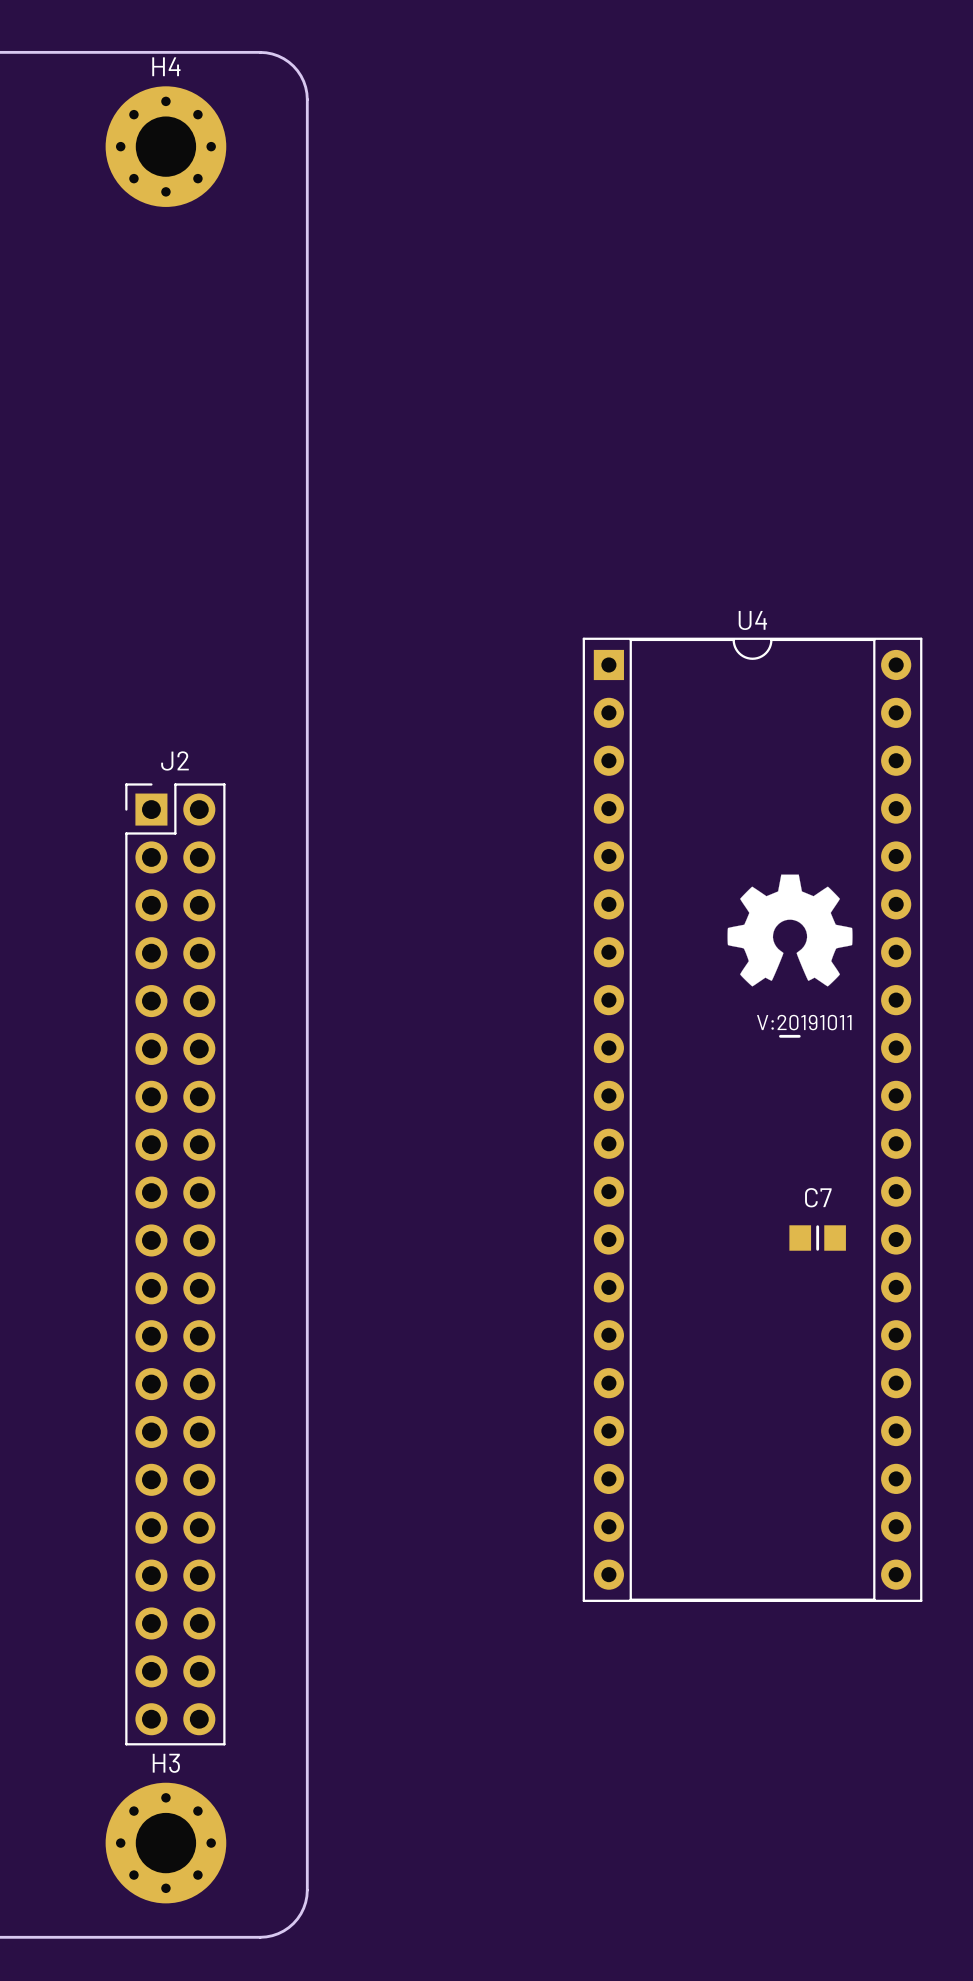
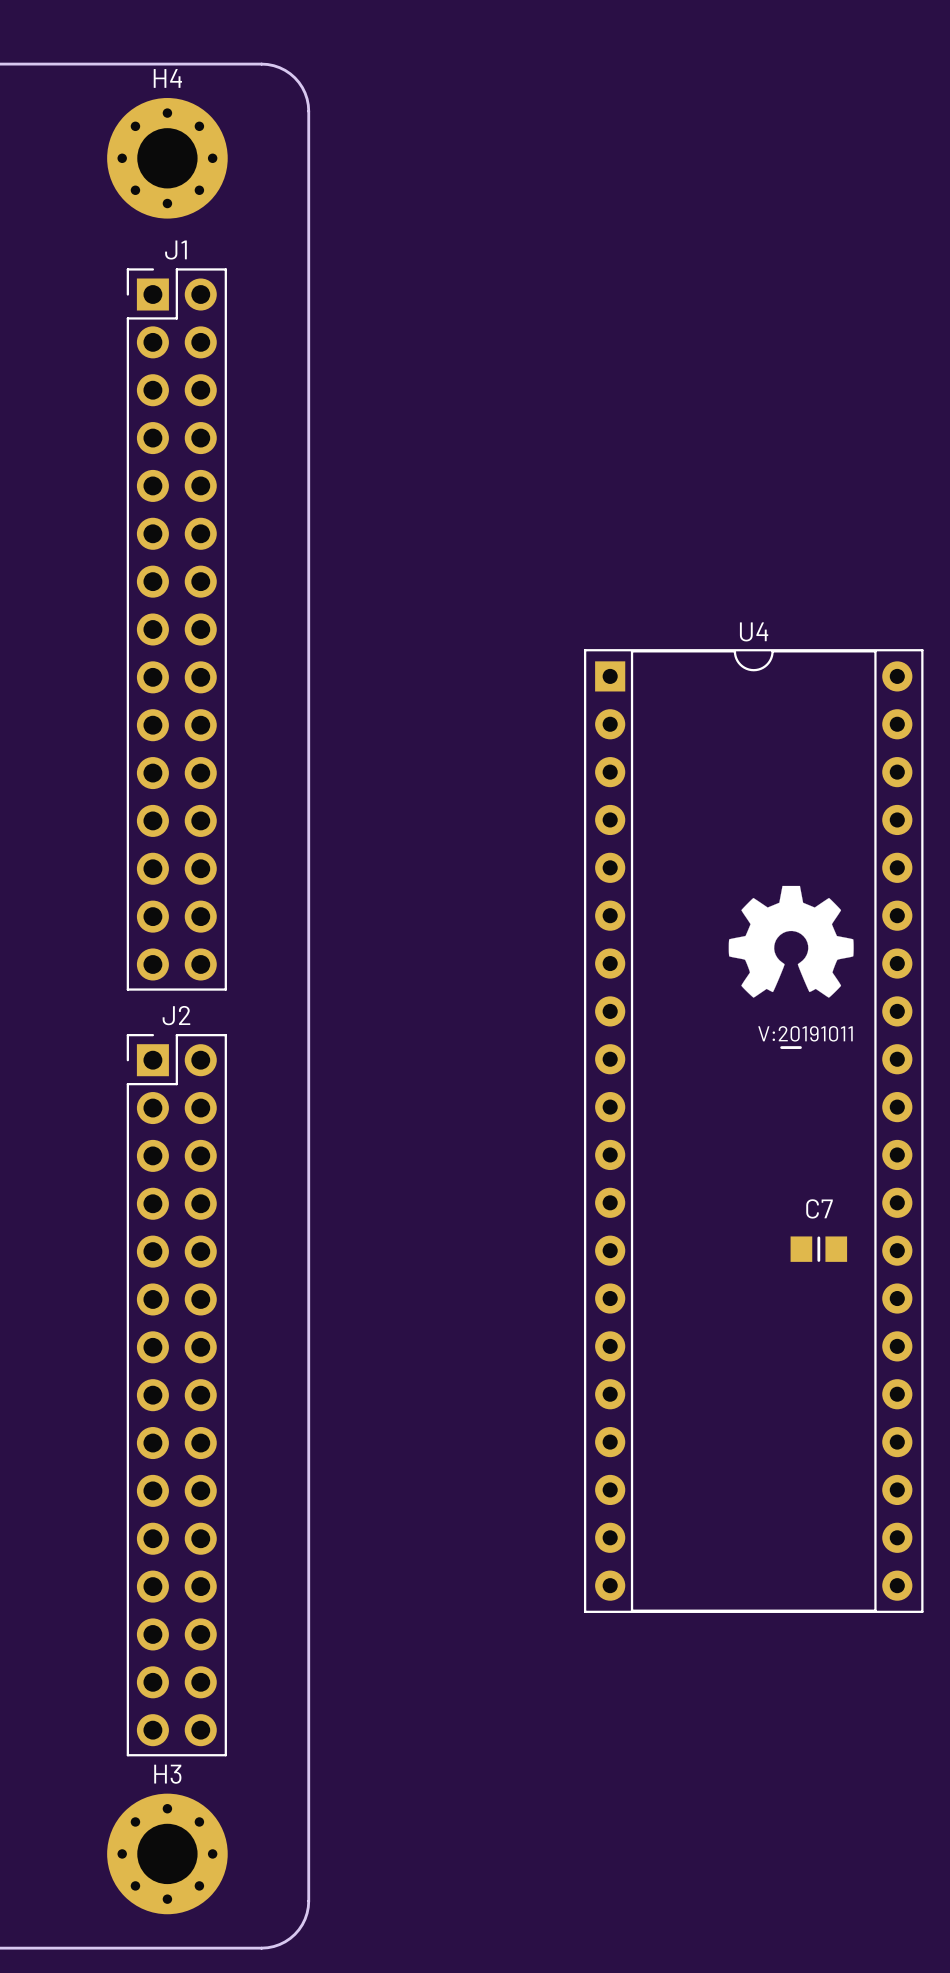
J1: none -> (176, 629)
J2 name position: J2 (174, 760) -> J2 (176, 1015)
J2 footprint: [125, 783, 226, 1746] -> [126, 1034, 227, 1757]

